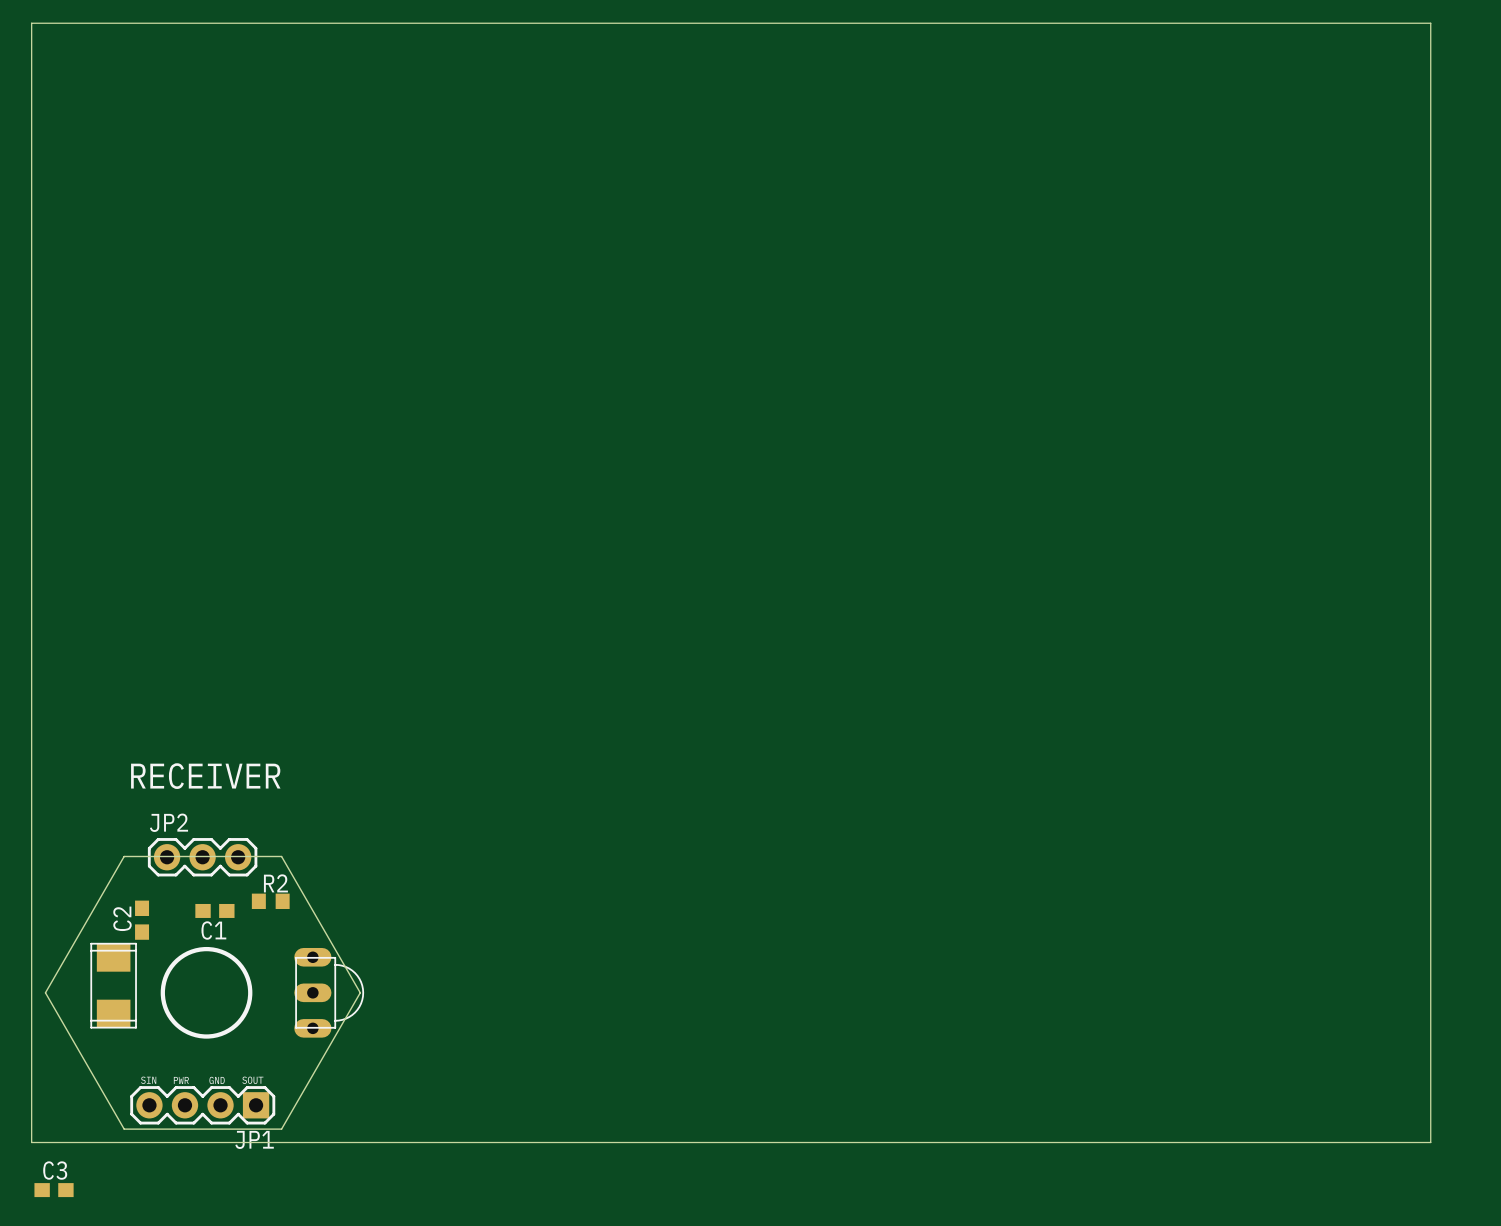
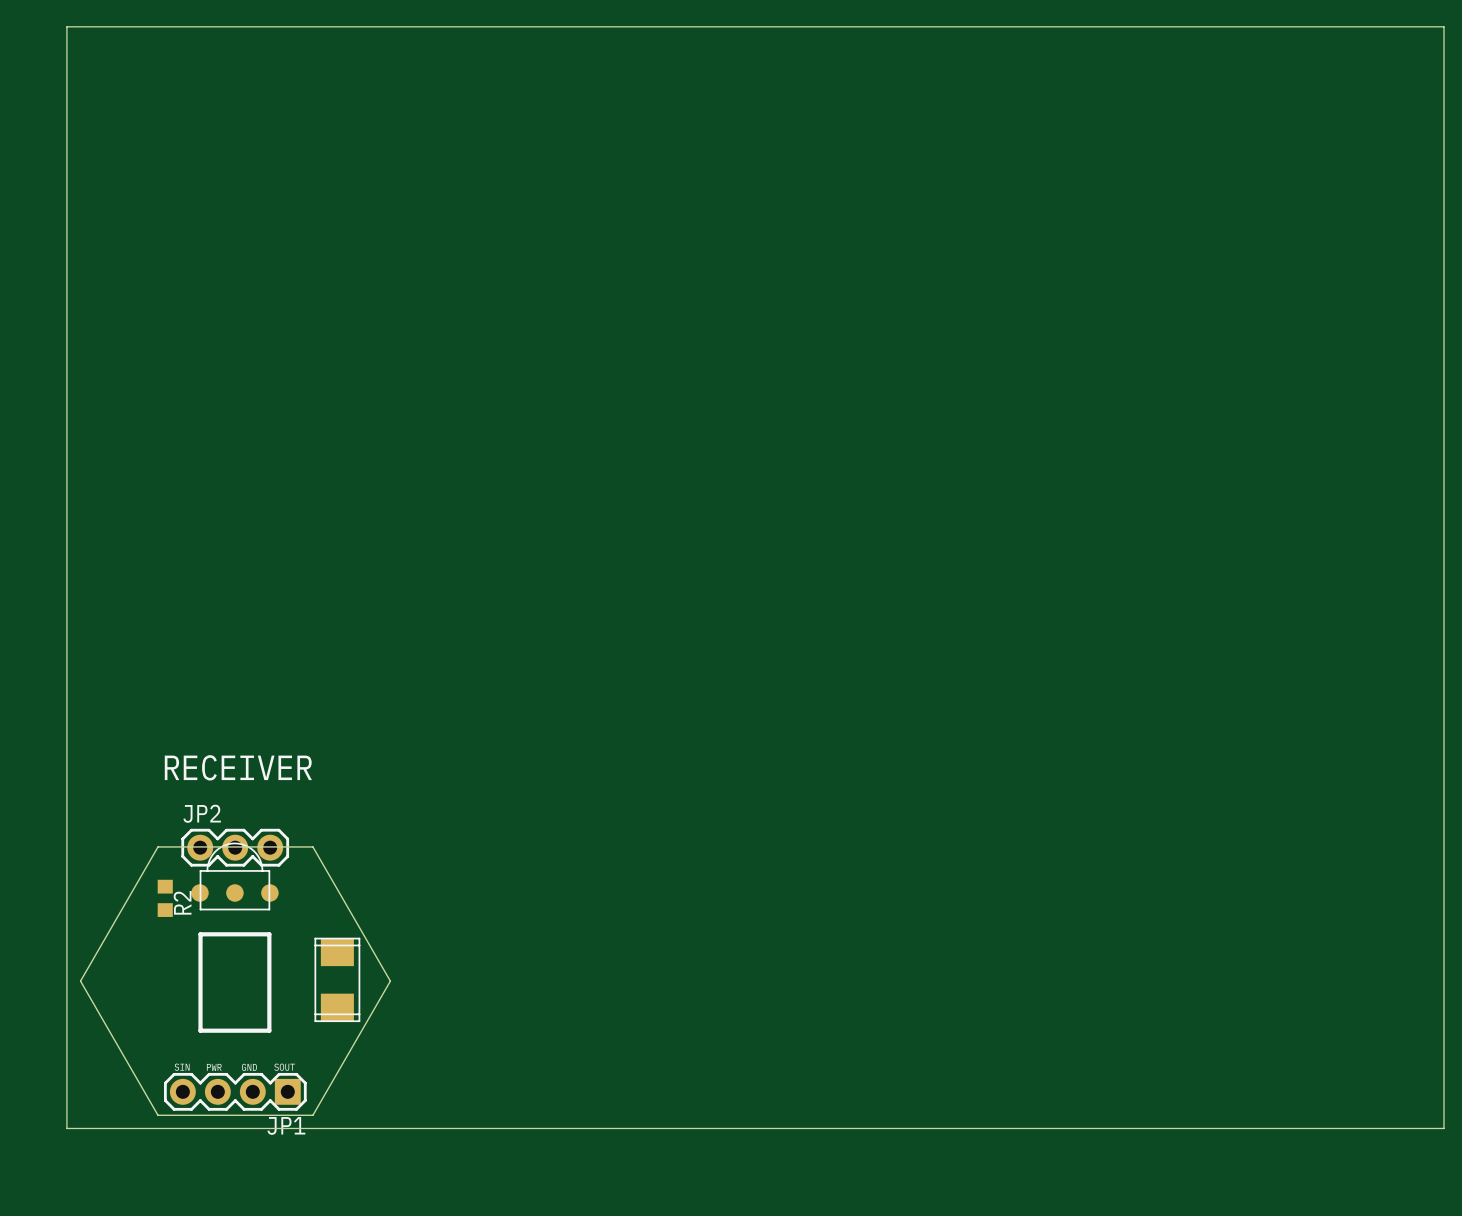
part: none -> (234, 876)
R2 rotation: 0° (270, 901) -> 90° clockwise (165, 898)
R2 position: (270, 901) -> (165, 898)
C1: (214, 910) -> none
C2: (142, 920) -> none
line: none -> (200, 934) (269, 934) (269, 1030) (200, 1030) (200, 934)
drawing: [160, 946, 253, 1039] -> none
part position: (113, 985) -> (337, 979)
part: (329, 992) -> none
C3: (54, 1190) -> none

